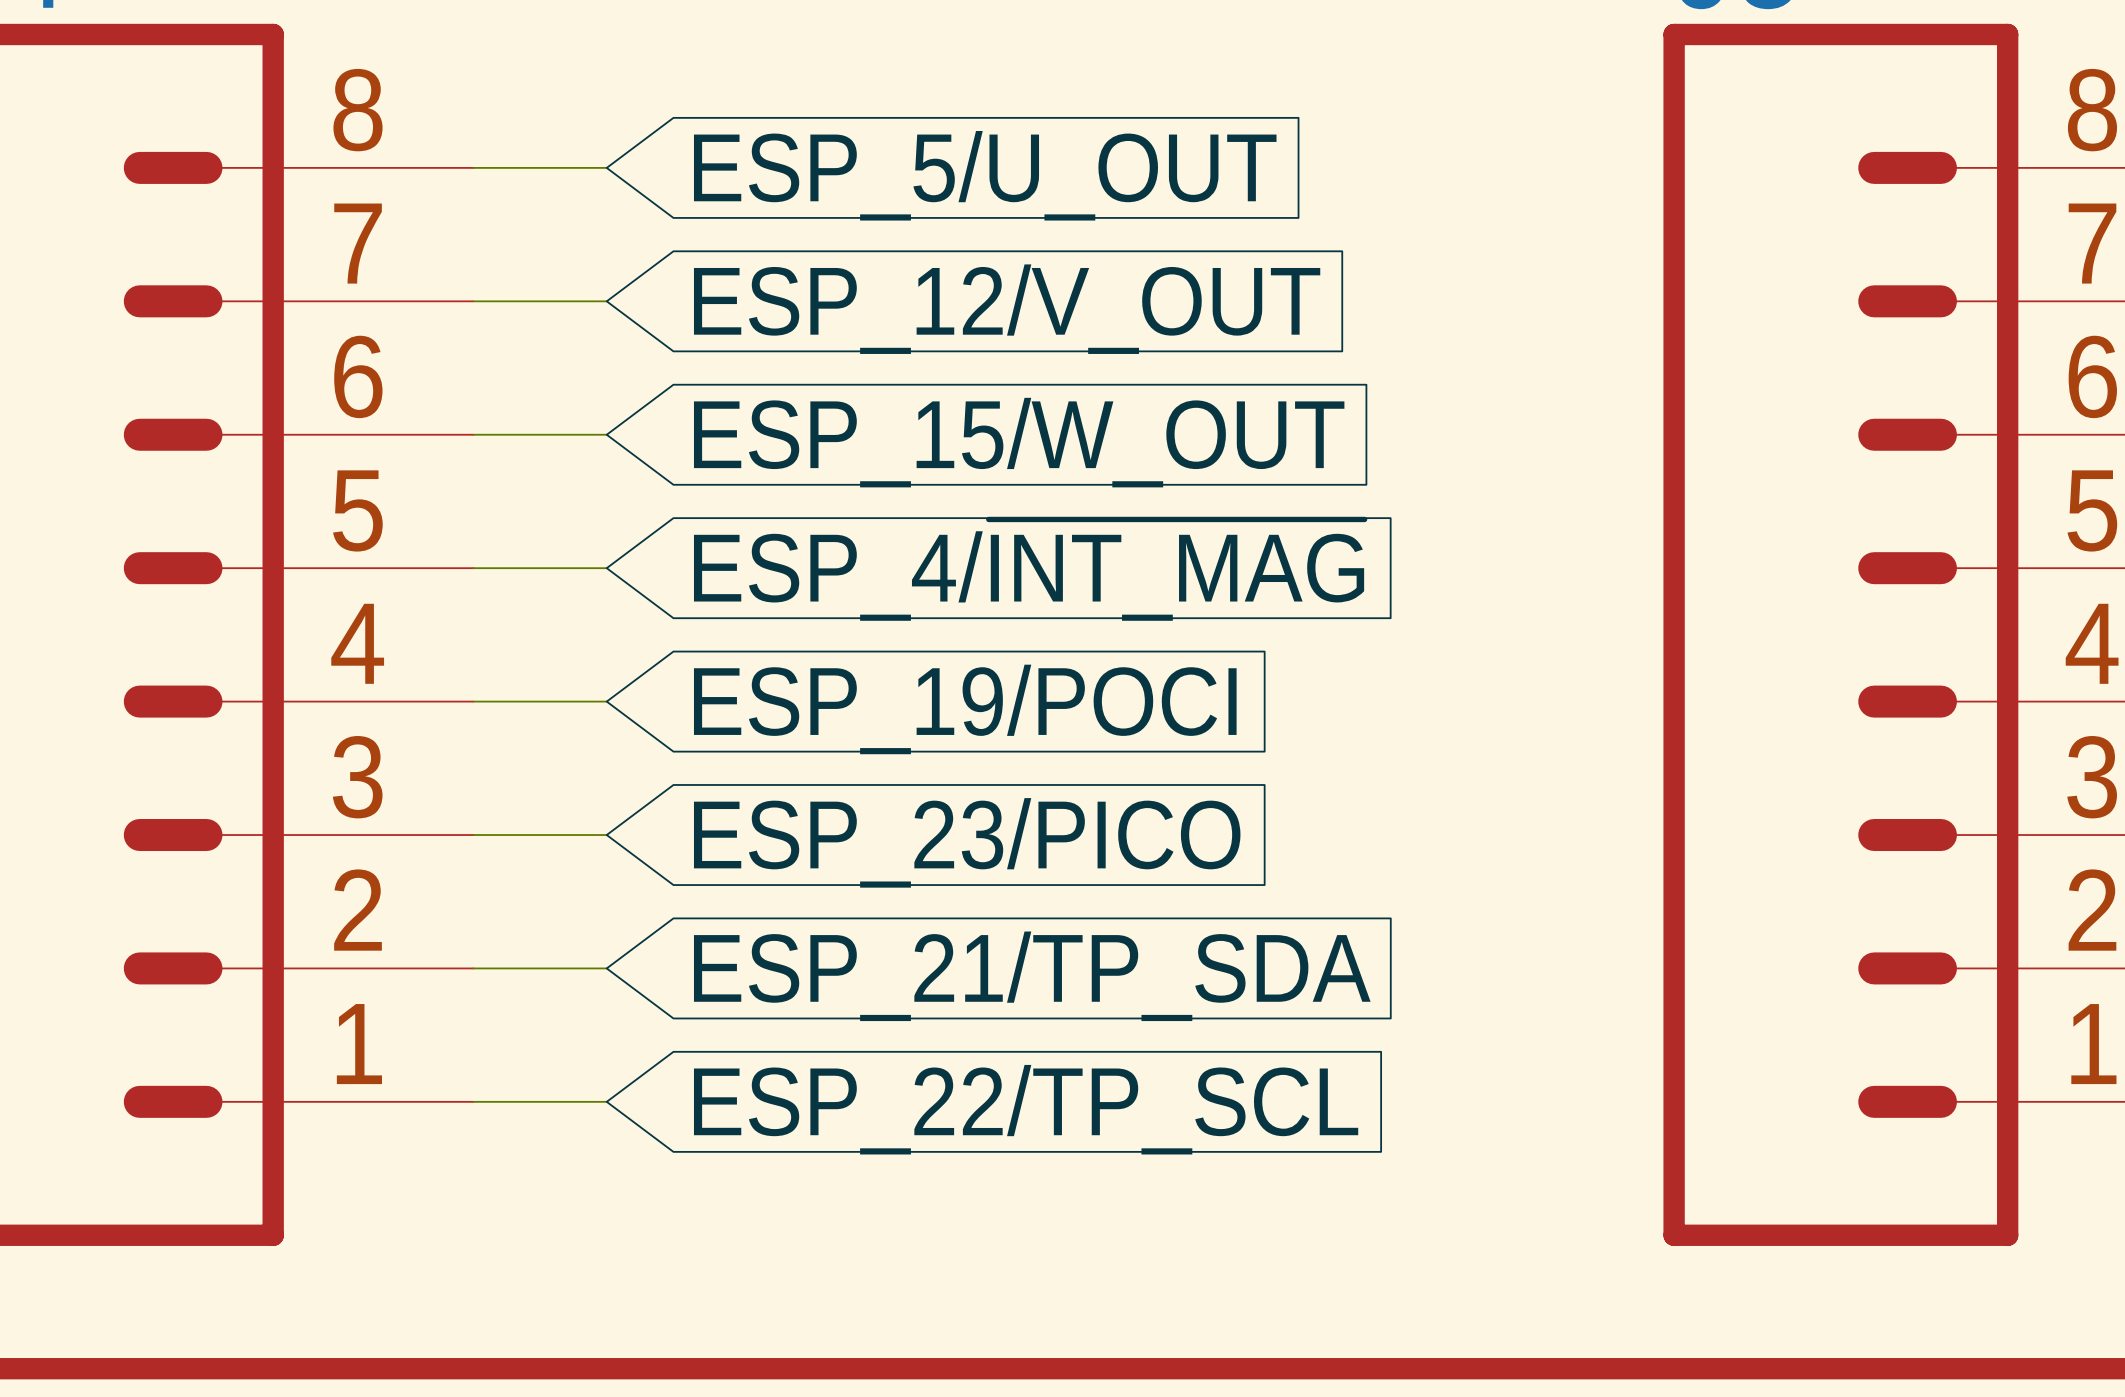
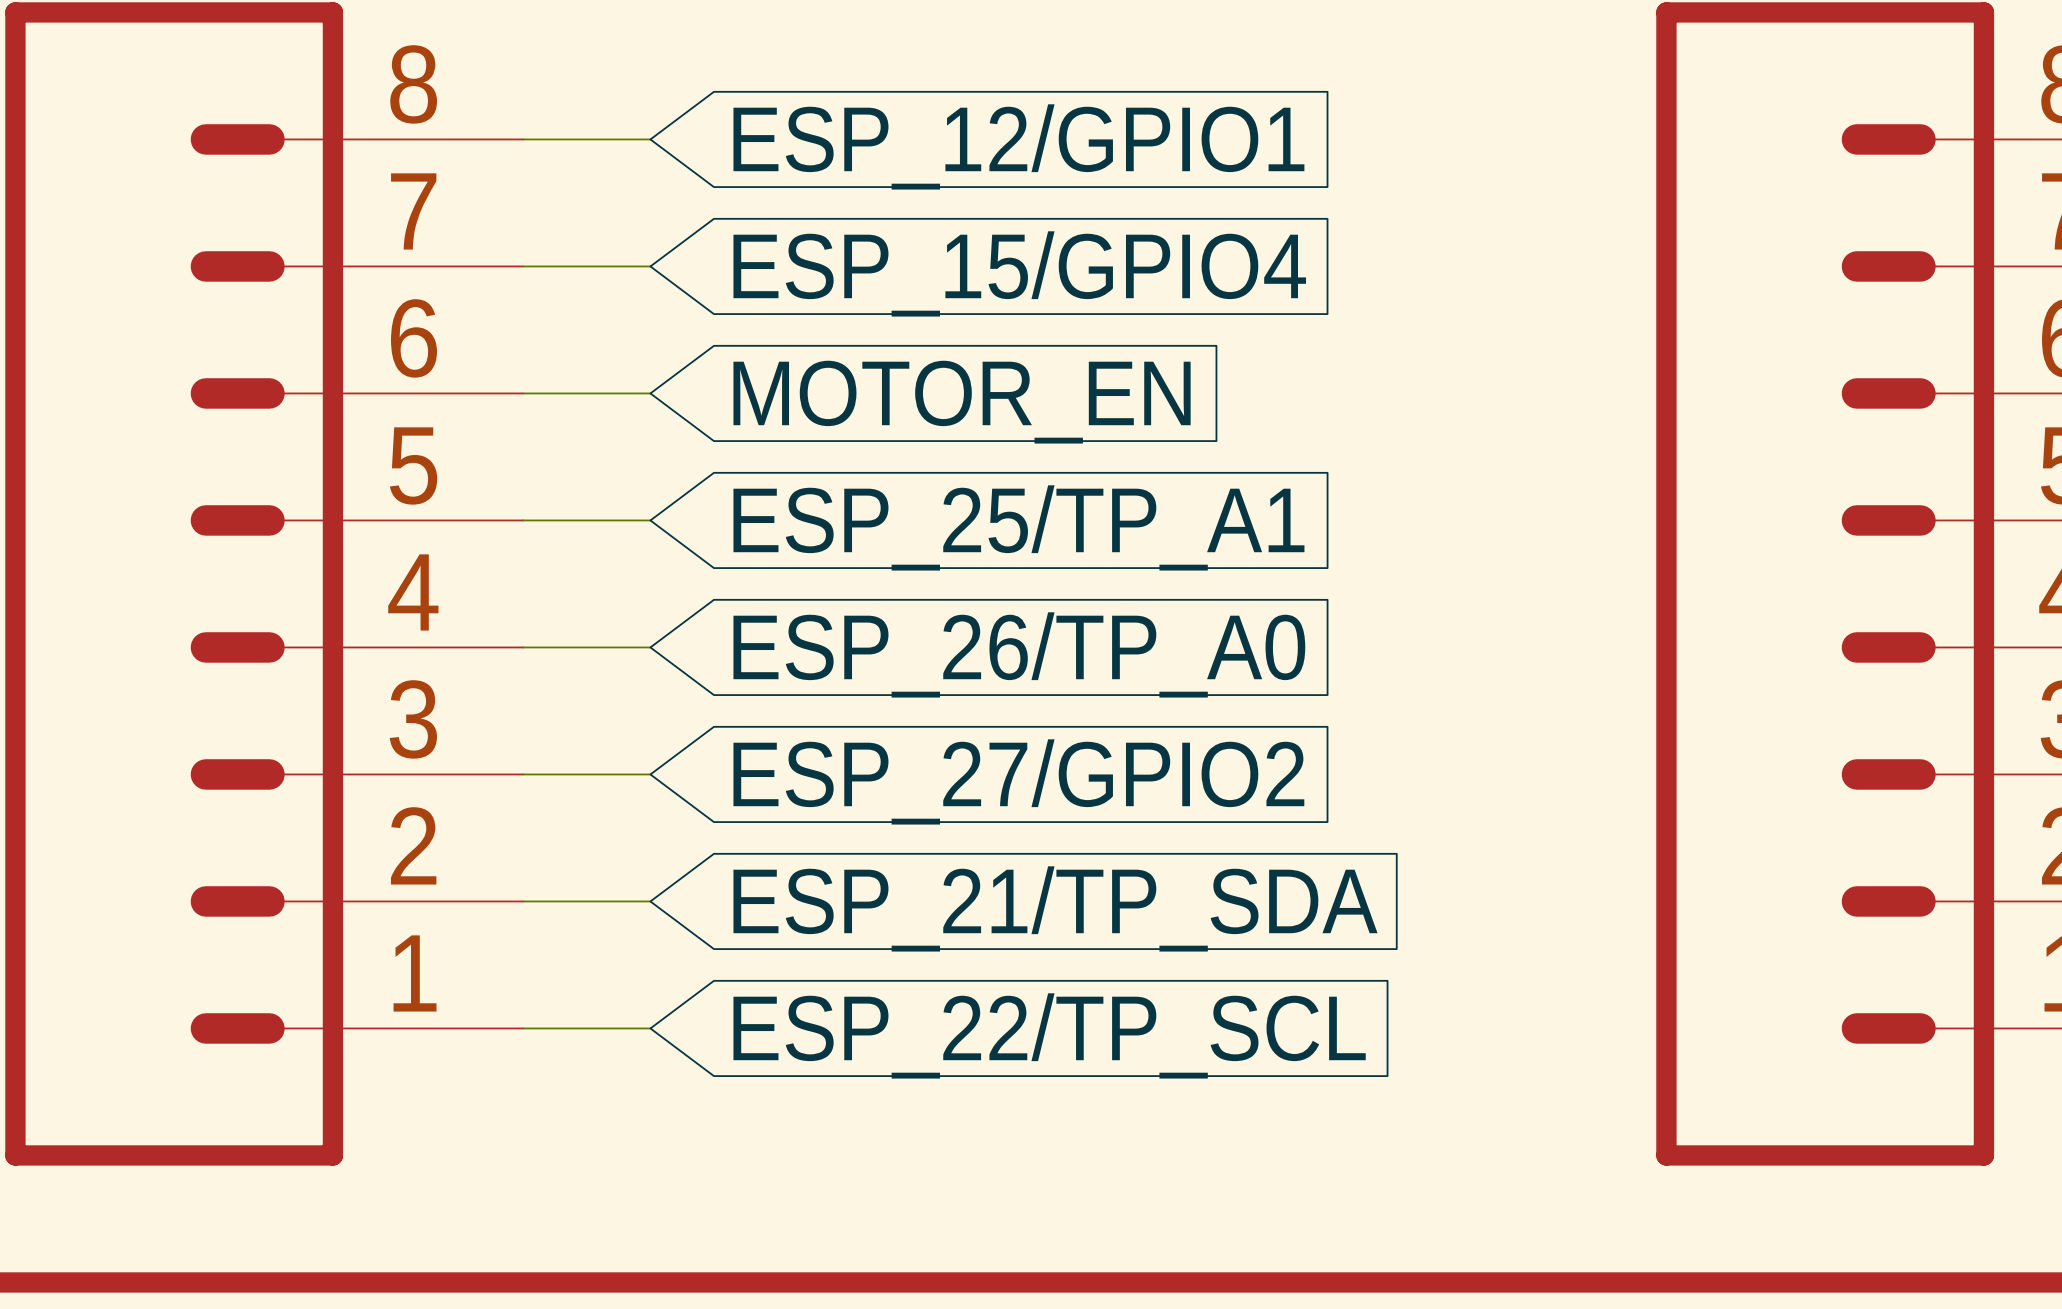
global label: ESP_5/U_OUT (985, 175) -> ESP_12/GPIO1 (1018, 146)
global label: ESP_12/V_OUT (1007, 309) -> ESP_15/GPIO4 (1019, 273)
global label: ESP_15/W_OUT (1019, 442) -> MOTOR_EN (962, 402)
global label: ESP_4/~{INT_MAG} (1029, 570) -> ESP_25/TP_A1 (1018, 527)
global label: ESP_19/POCI (965, 709) -> ESP_26/TP_A0 (1019, 654)
global label: ESP_23/PICO (967, 842) -> ESP_27/GPIO2 (1018, 781)

